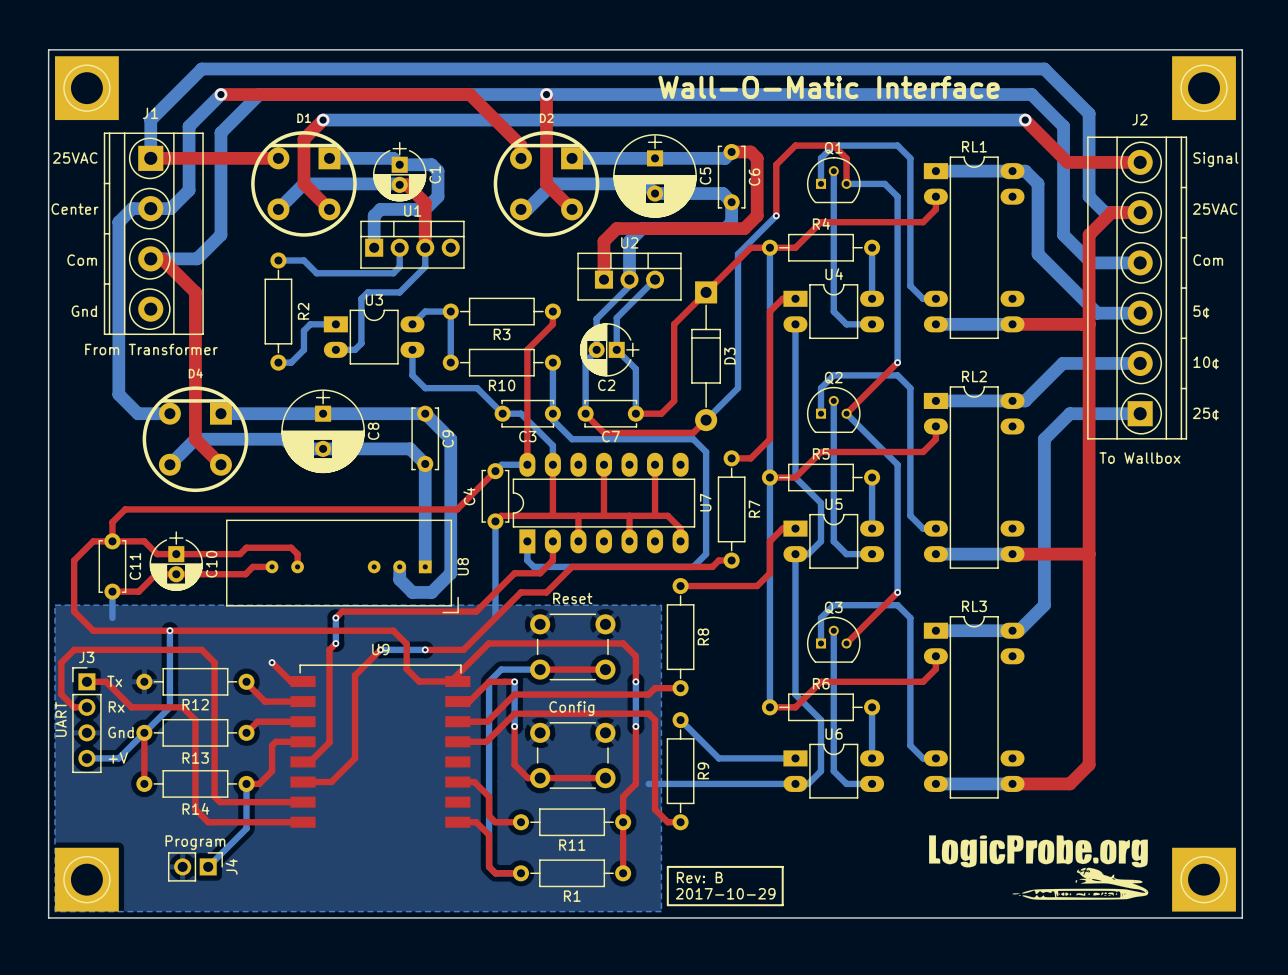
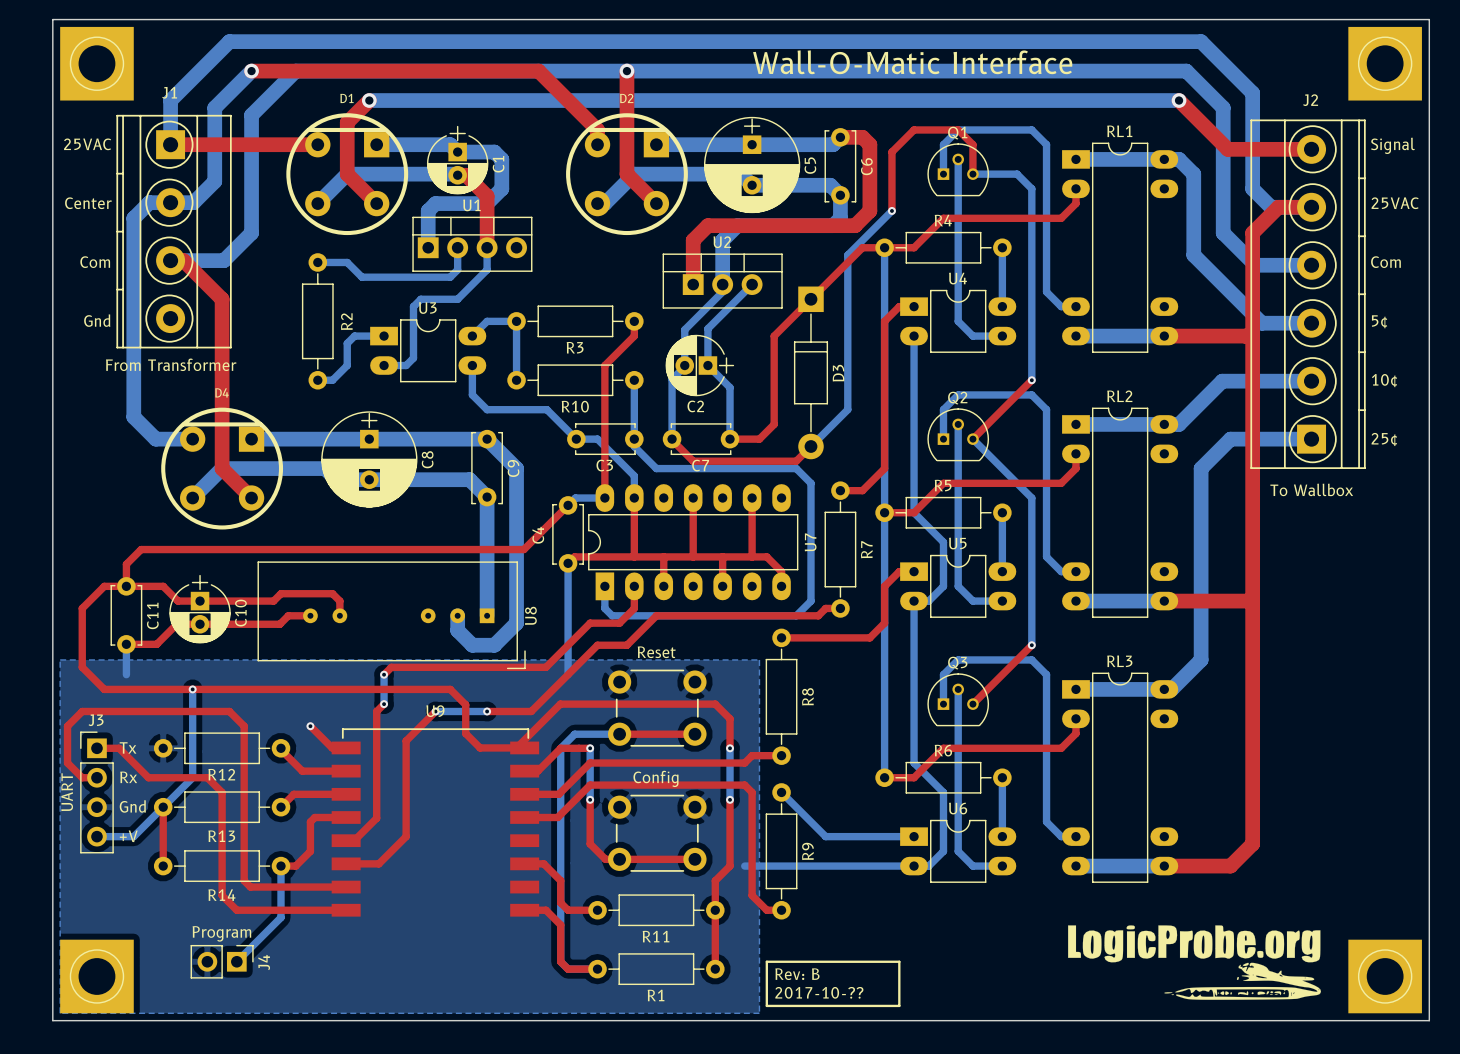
text: 2017-10-29 (725, 893) -> 2017-10-?? (819, 992)

